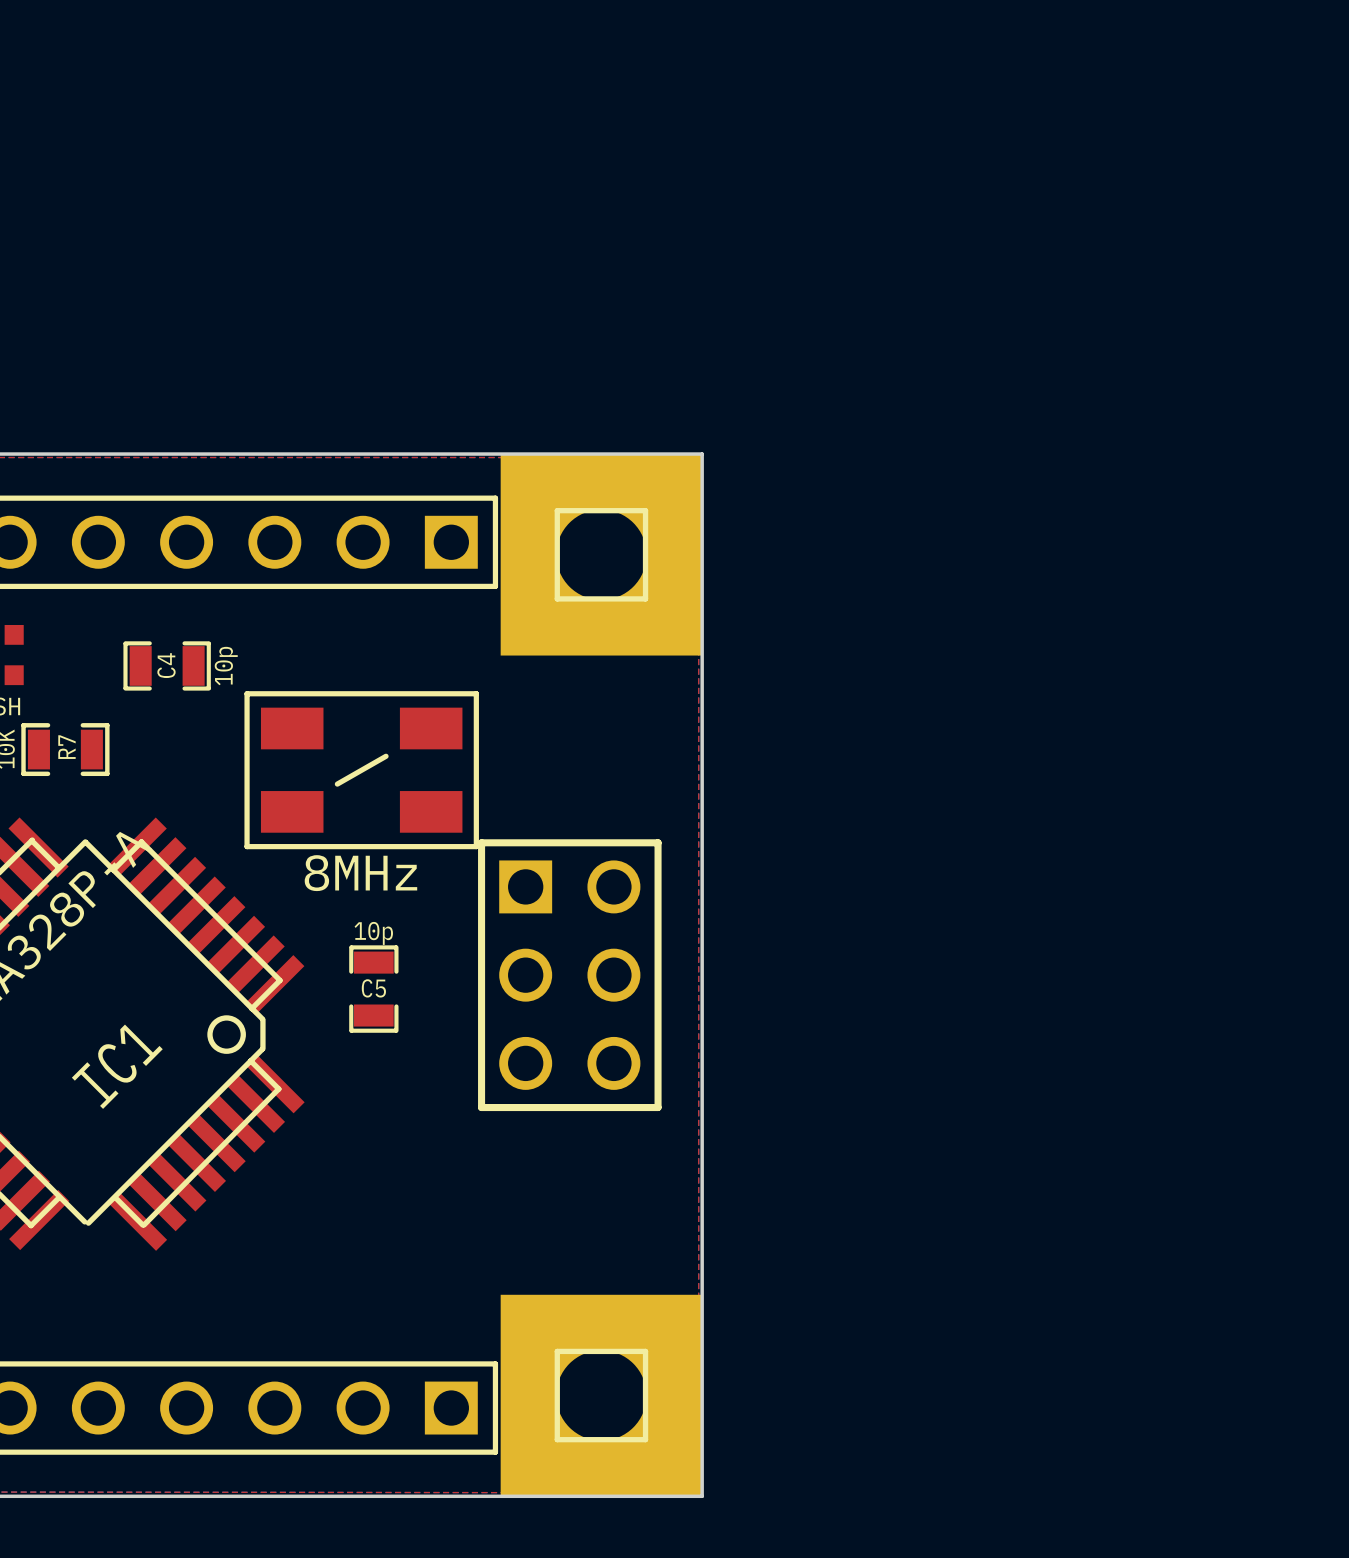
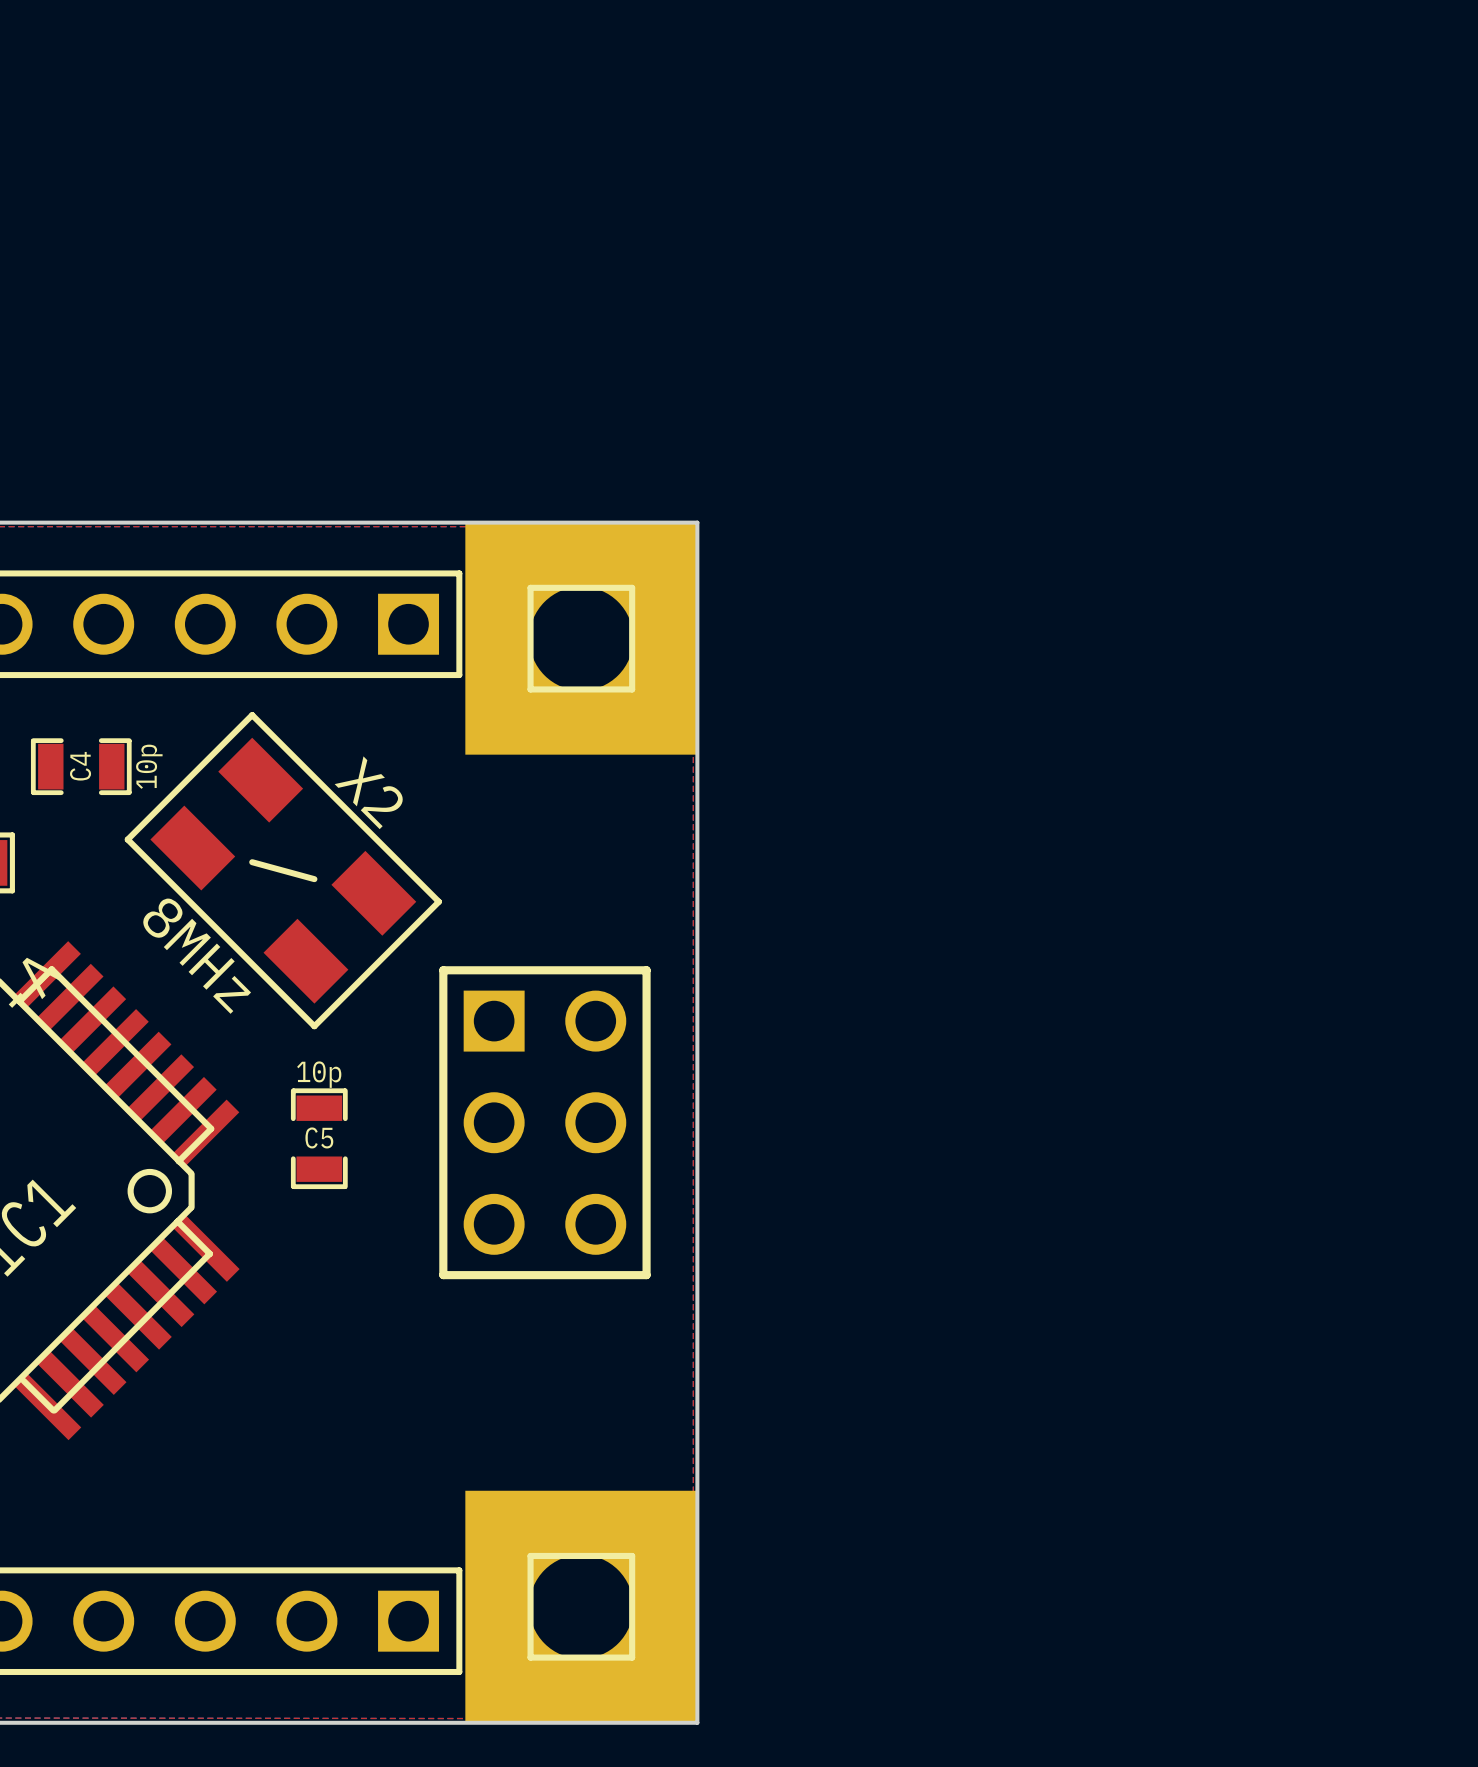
X2: none -> 8MHz (283, 870)
part: 8MHz (361, 770) -> none

